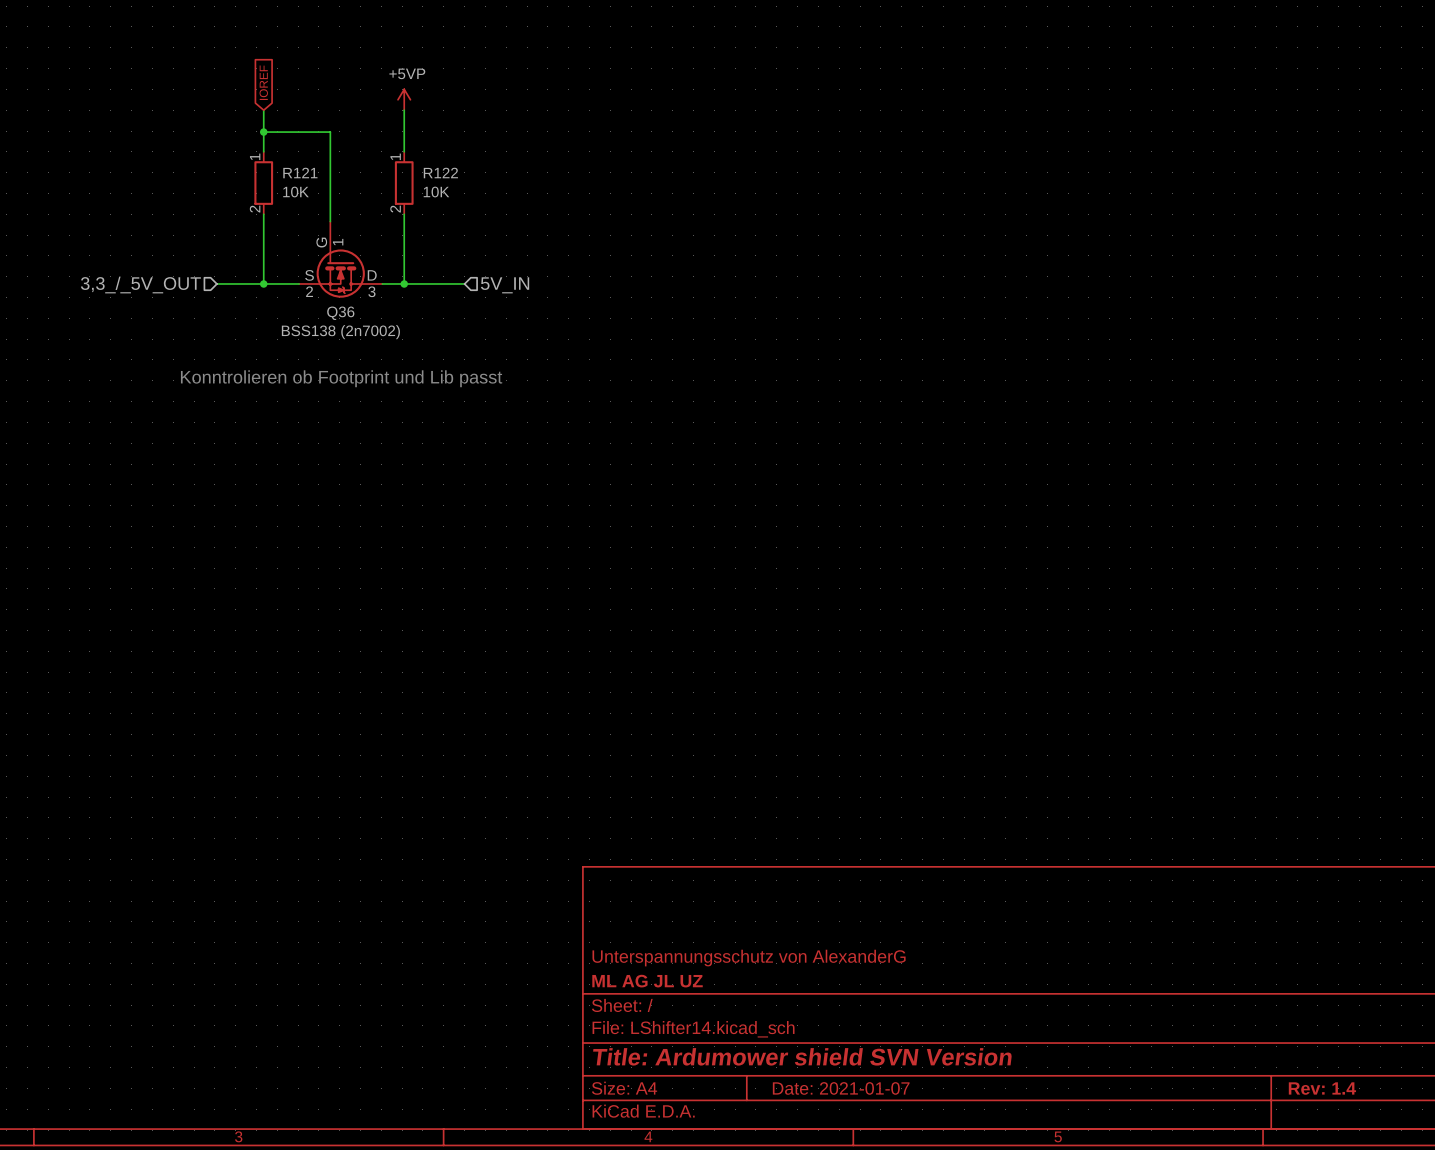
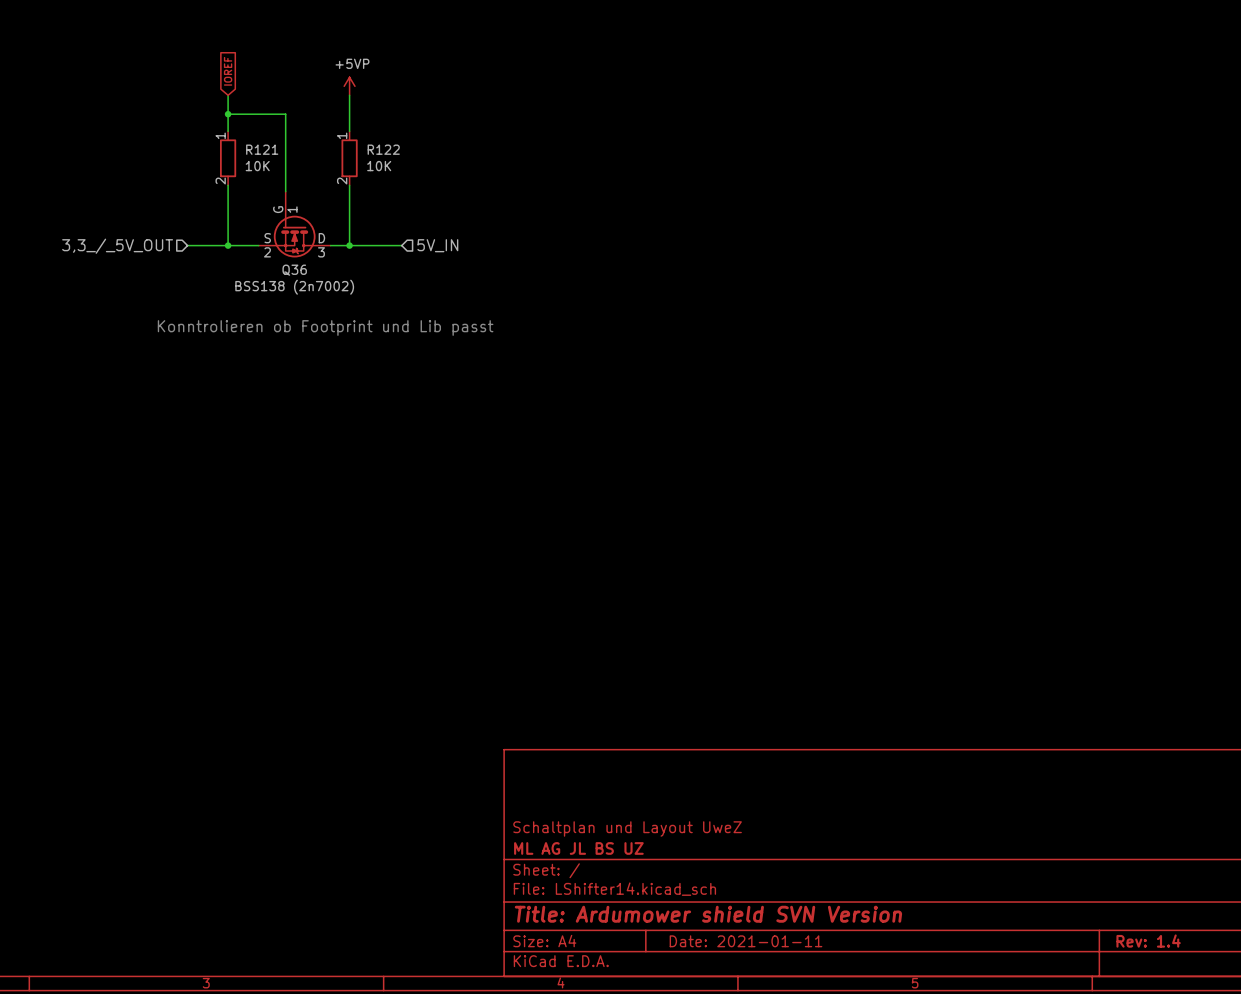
title block: Unterspannungsschutz von AlexanderG (749, 958) -> Schaltplan und Layout UweZ (627, 828)
title block: ML AG JL UZ (647, 981) -> ML AG JL BS UZ (578, 848)
title block: Date: 2021-01-07 (841, 1088) -> Date: 2021-01-11 (746, 941)

